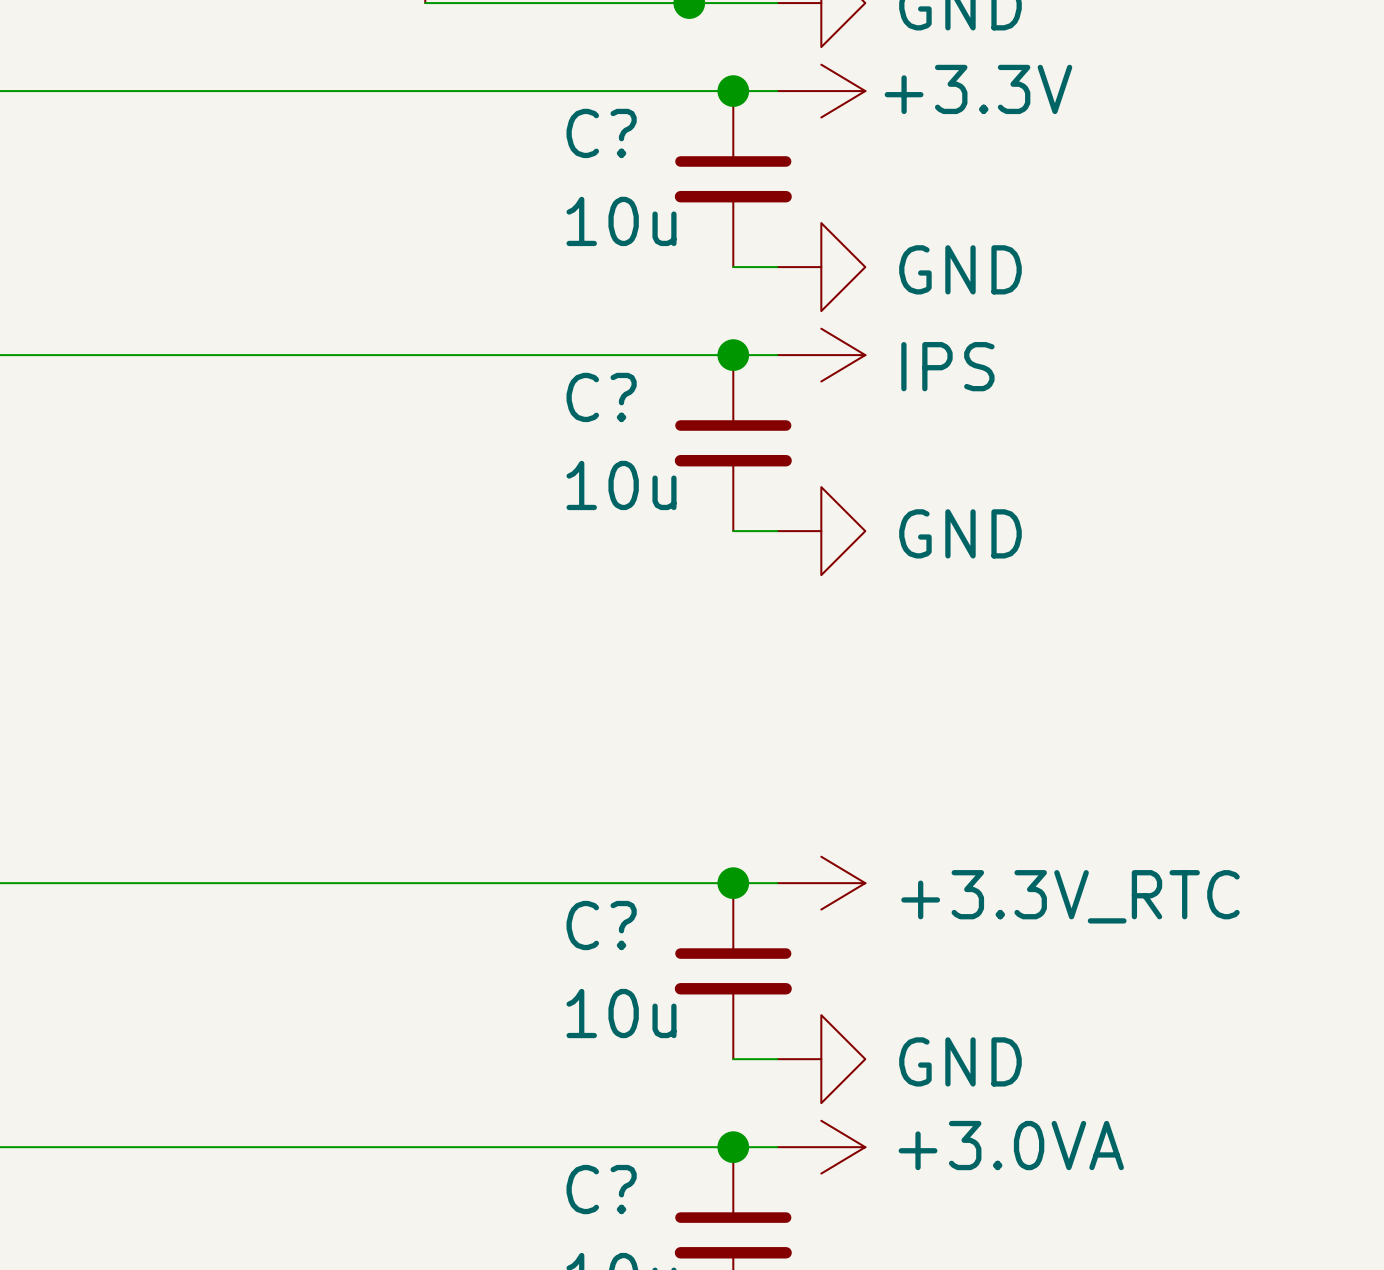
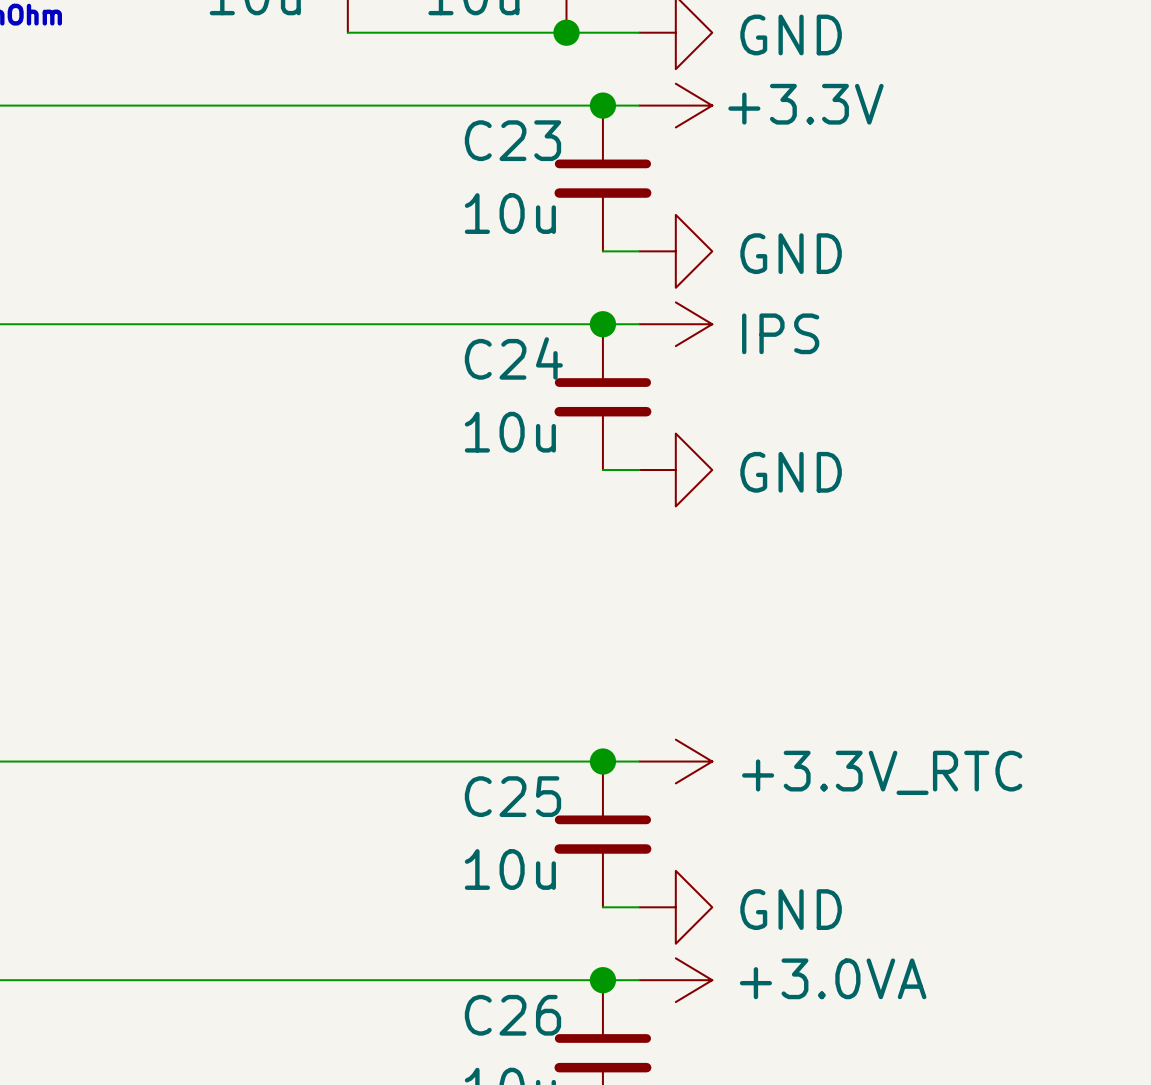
C? name: C? (601, 133) -> C23 (512, 140)
C? name: C? (601, 397) -> C24 (513, 358)
C? name: C? (601, 925) -> C25 (512, 796)
C? name: C? (601, 1189) -> C26 (512, 1015)

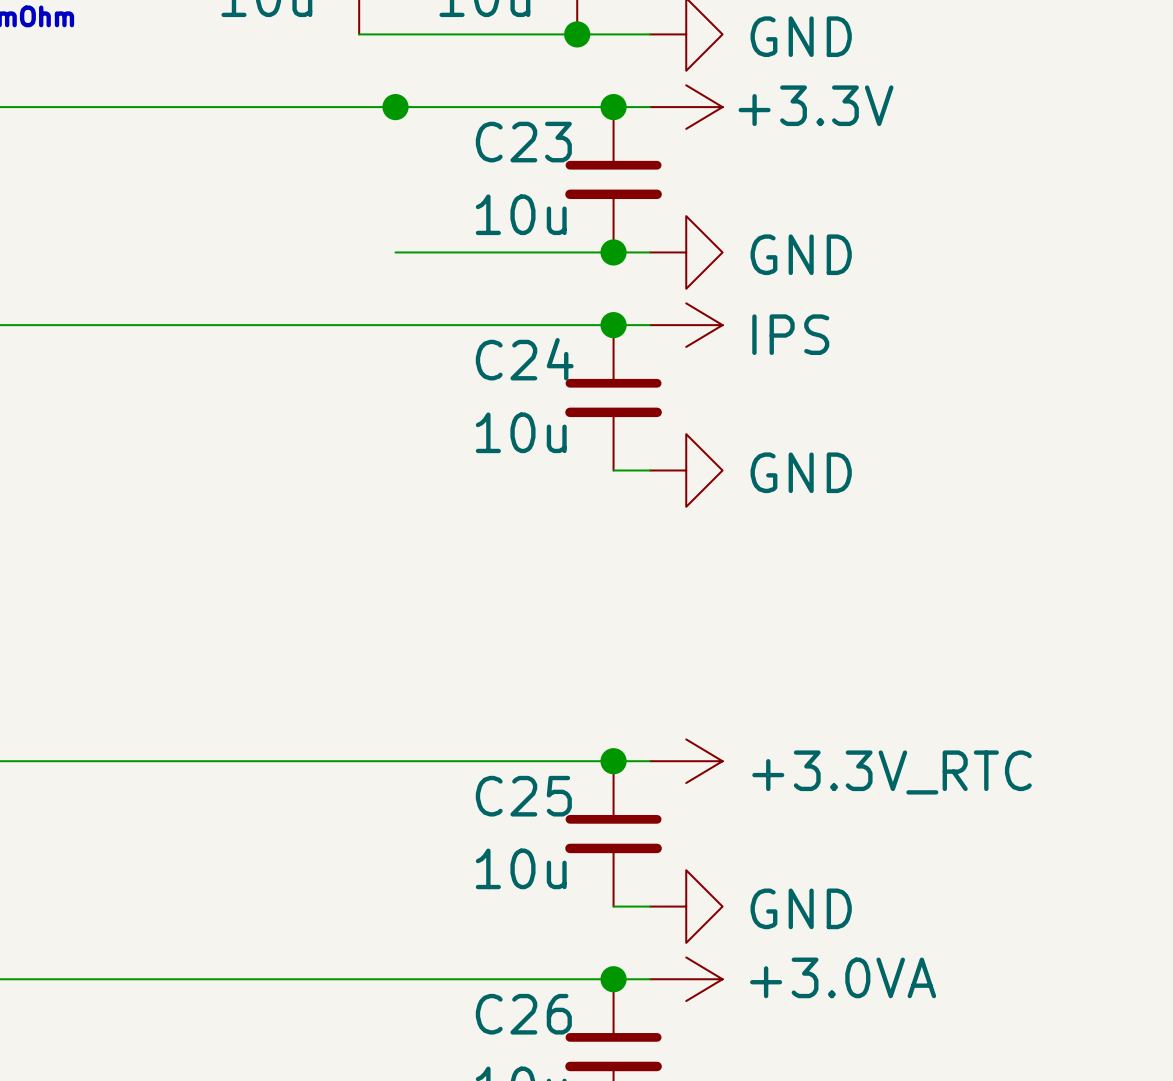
junction: none -> (395, 107)
wire: none -> (395, 252) (613, 252)
junction: none -> (613, 252)

